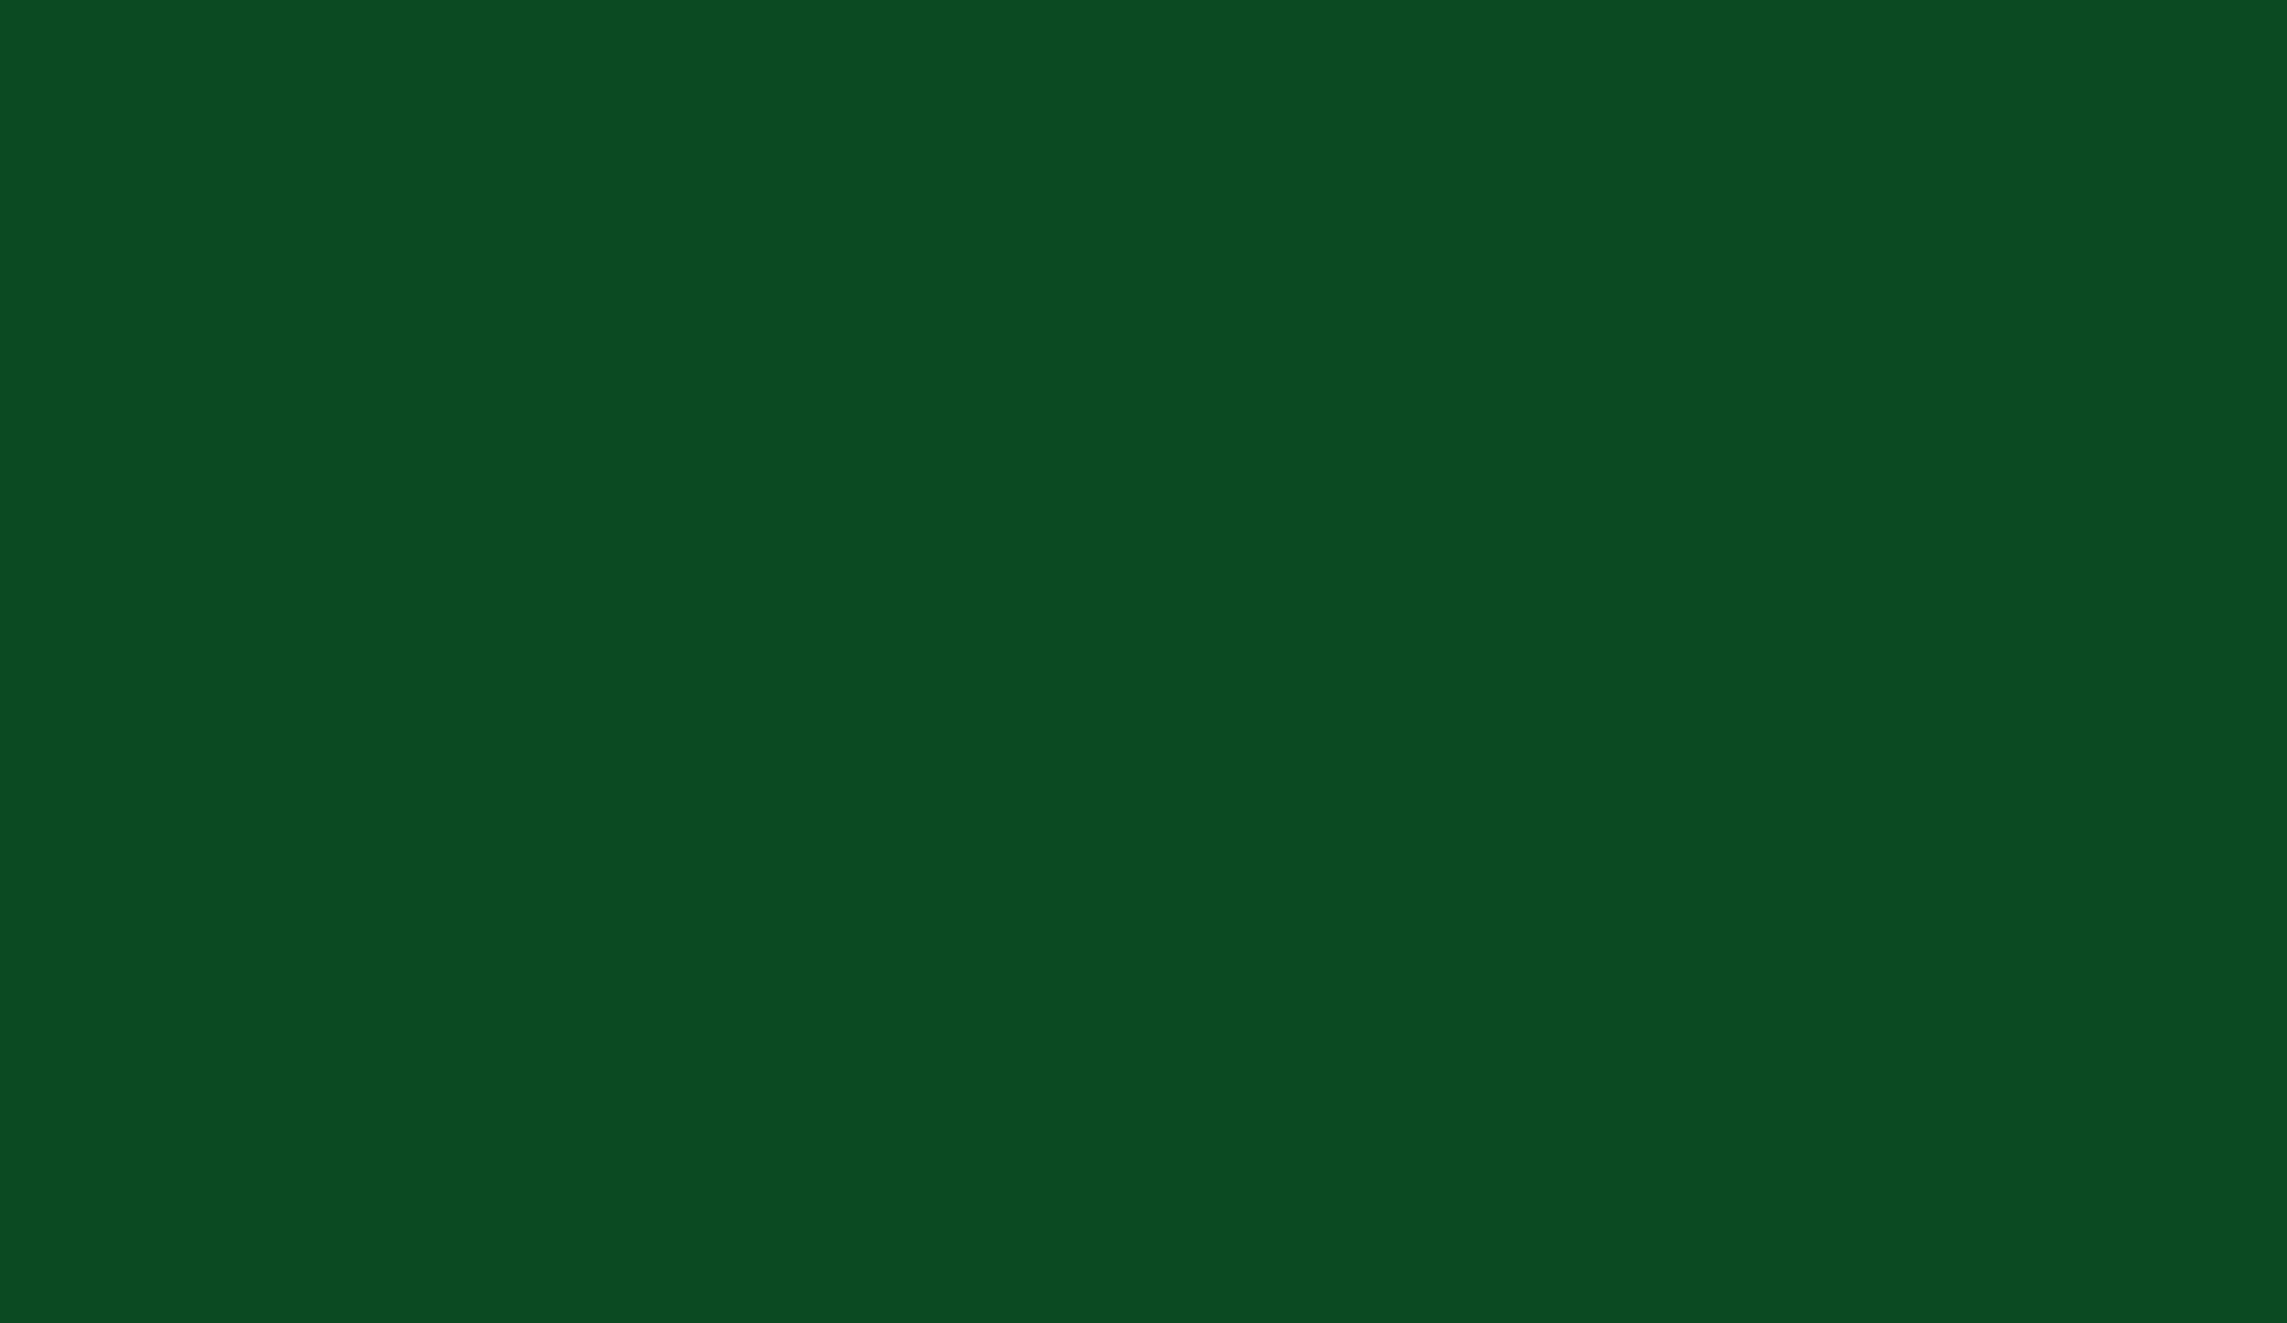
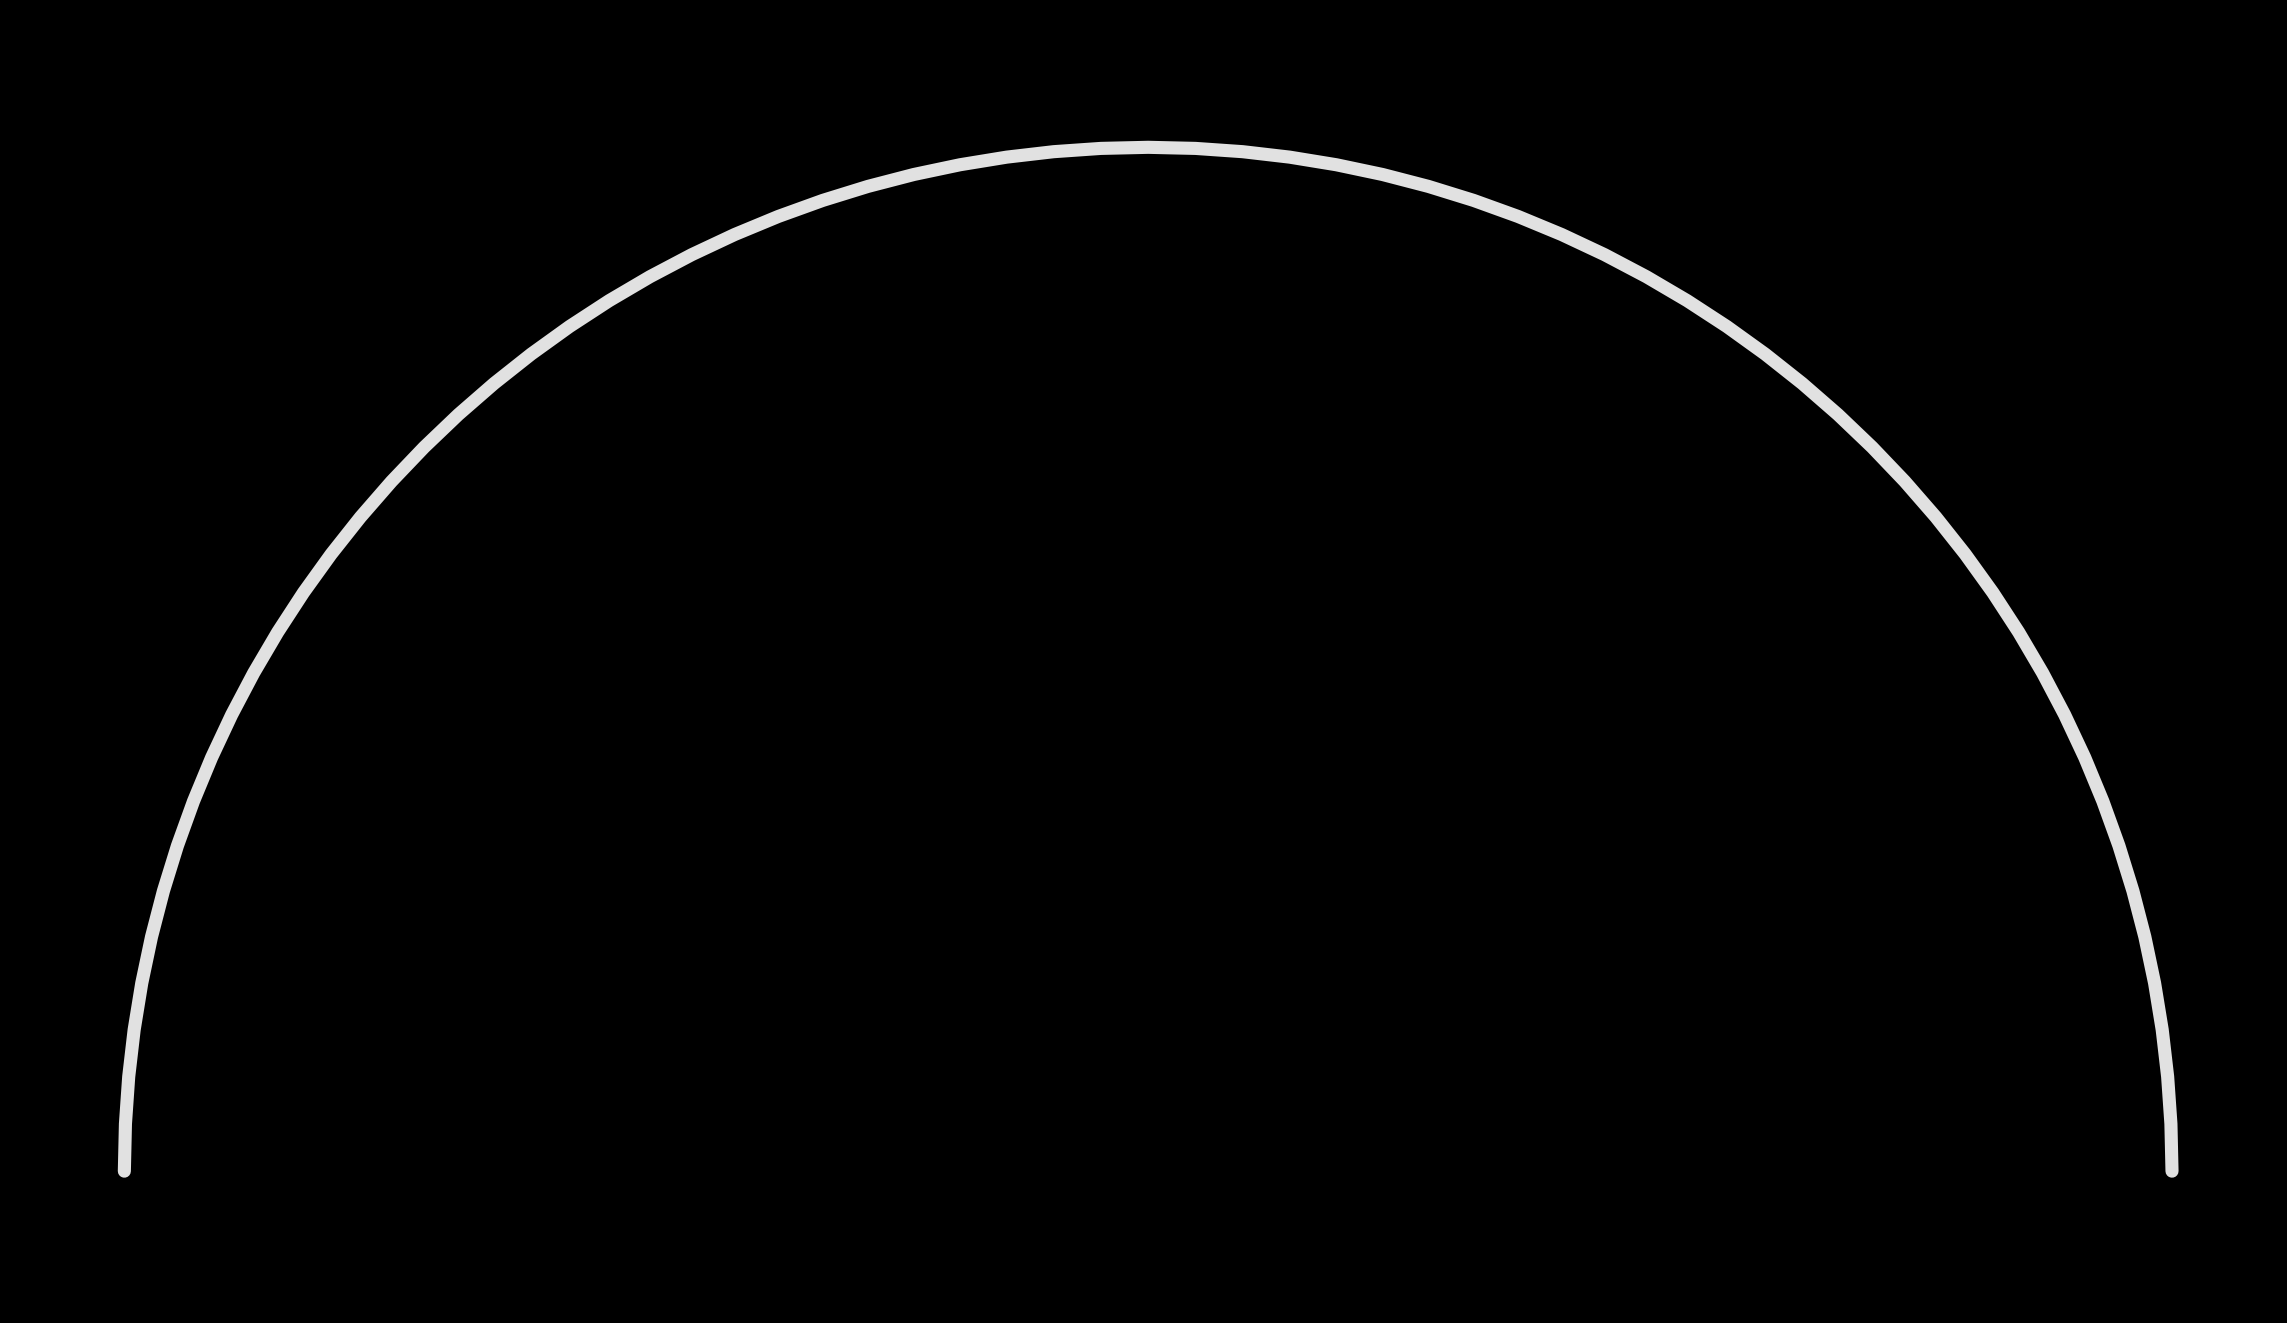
line: none -> (124, 1171) (128, 1076) (141, 983) (151, 936) (177, 845) (211, 757) (253, 672) (303, 592) (360, 517) (424, 447) (494, 383) (569, 326) (649, 276) (734, 234) (822, 200) (913, 174) (960, 164) (1053, 151) (1148, 147) (1242, 151) (1336, 164) (1382, 174) (1473, 200) (1561, 234) (1646, 276) (1726, 326) (1802, 383) (1872, 447) (1935, 517) (1992, 592) (2042, 672) (2084, 757) (2118, 845) (2144, 936) (2154, 983) (2167, 1076) (2172, 1171)

